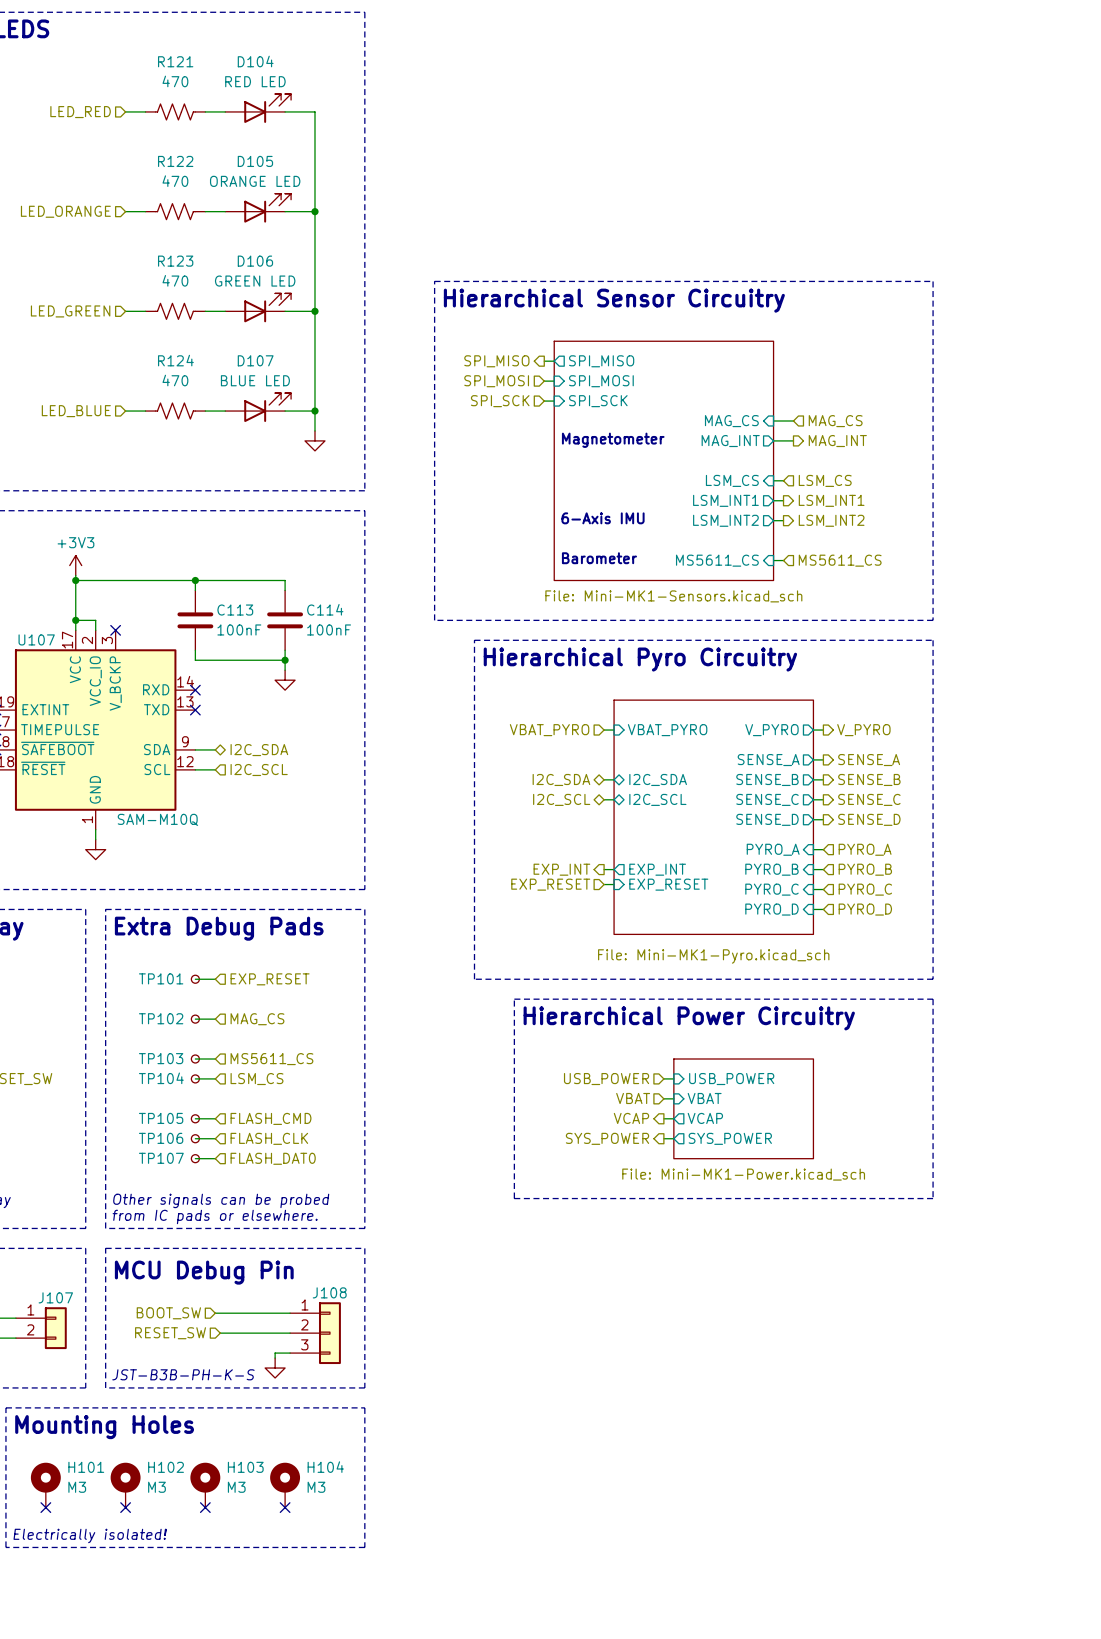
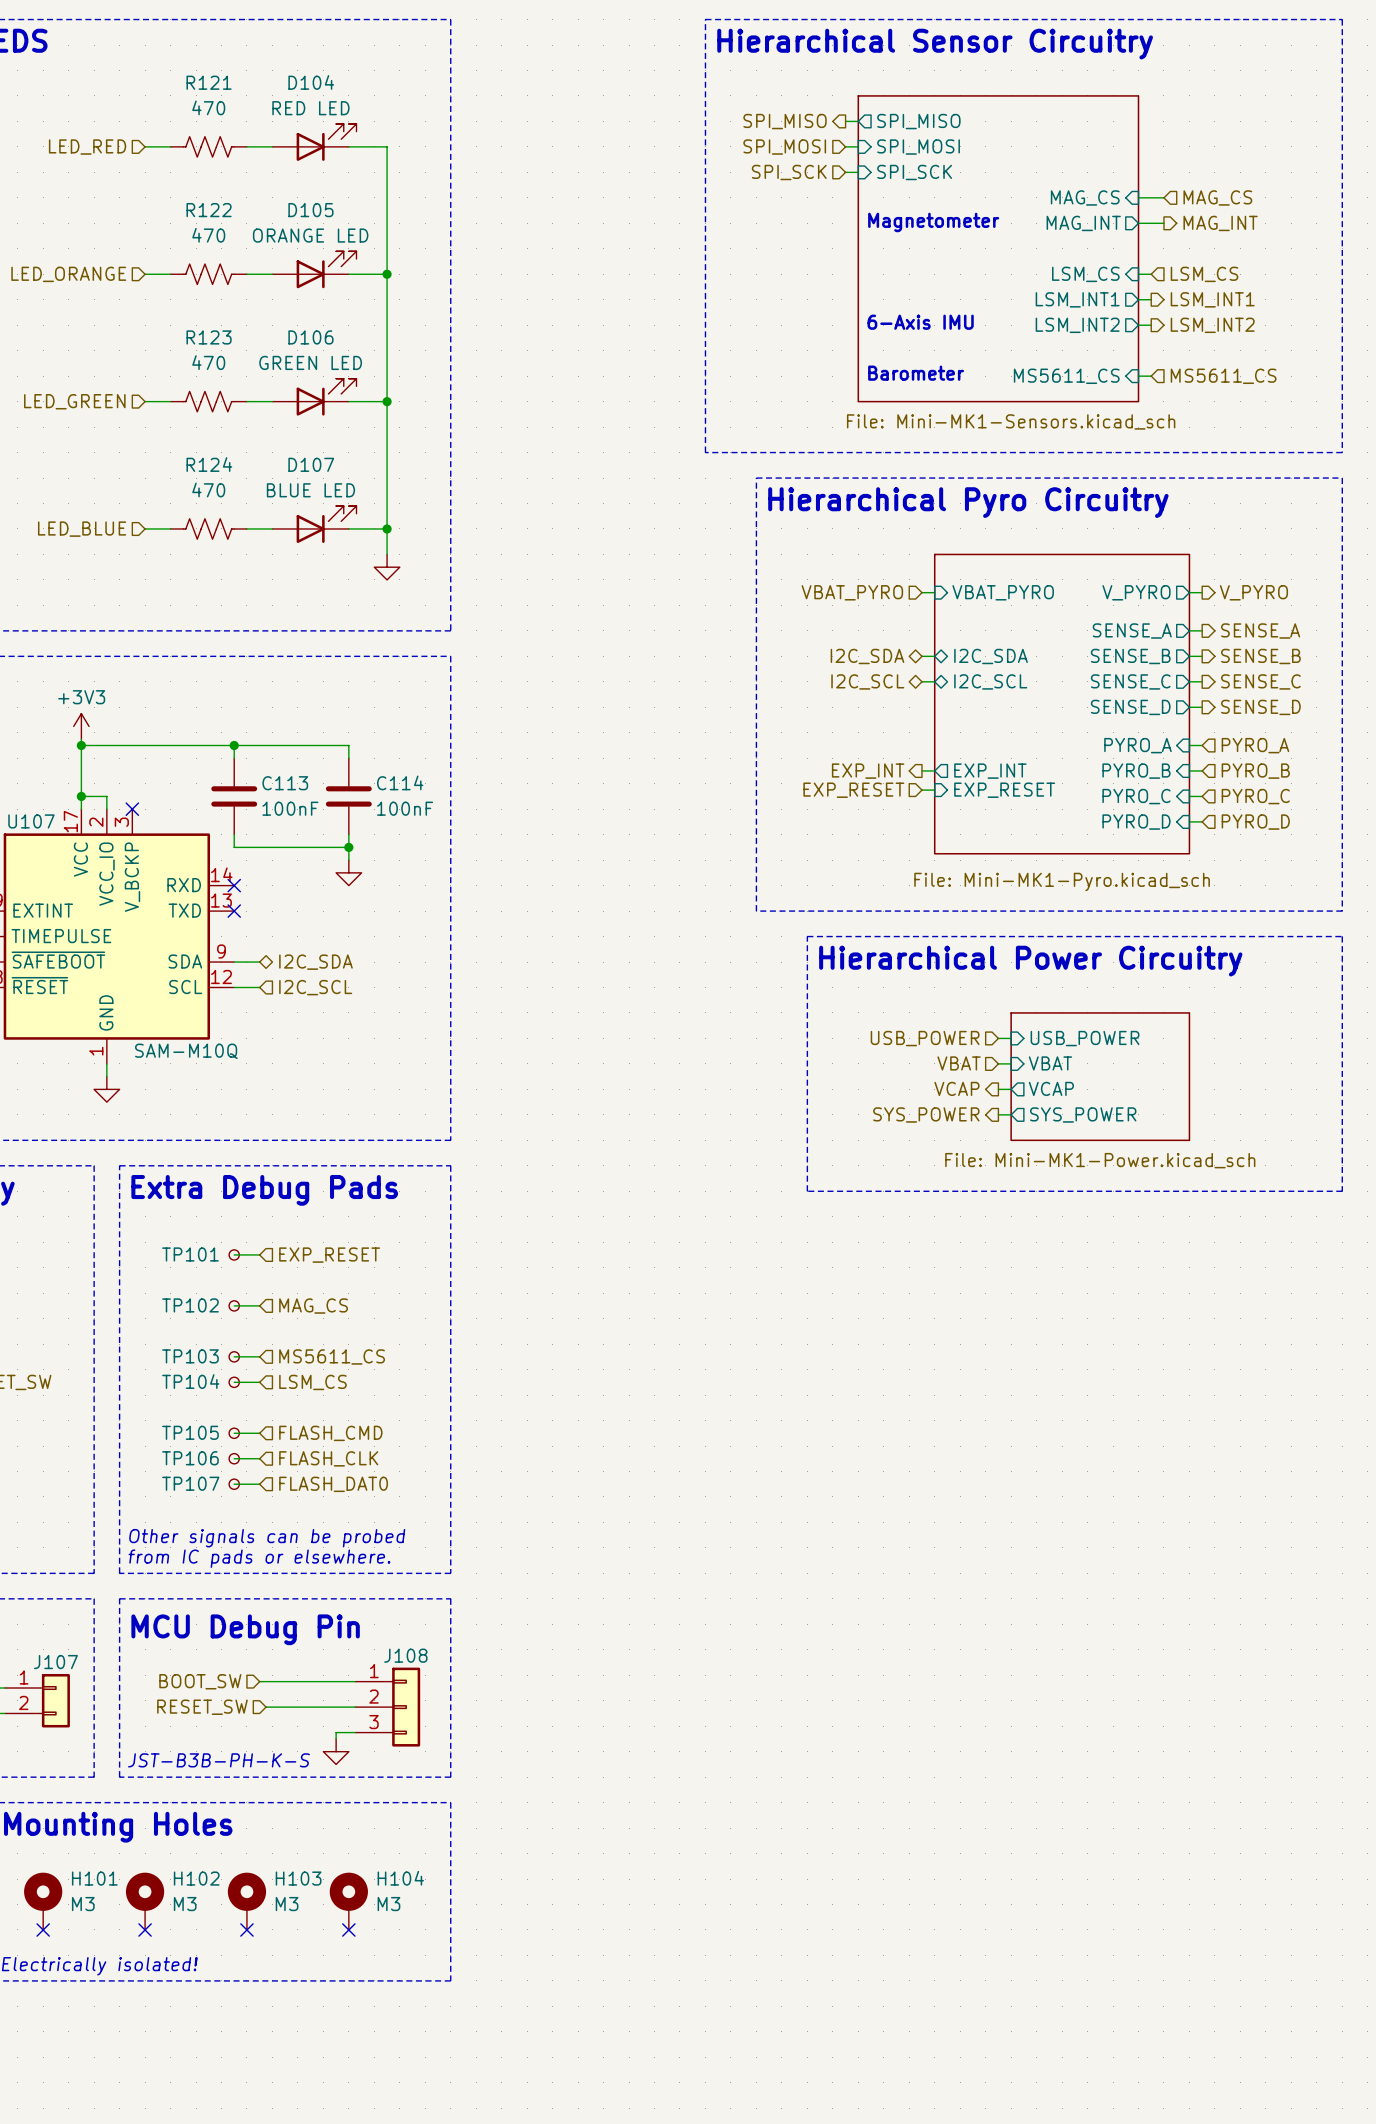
line: none -> (705, 19) (1342, 19) (1342, 452) (705, 452) (705, 19)
text: none -> Hierarchical Sensor Circuitry (935, 44)
hierarchical label: none -> SPI_MISO (785, 121)
wire: none -> (845, 121) (858, 121)
sheet pin: none -> SPI_MISO (918, 121)
wire: none -> (845, 146) (858, 146)
hierarchical label: none -> SPI_MOSI (784, 147)
sheet pin: none -> SPI_MOSI (918, 147)
wire: none -> (845, 172) (858, 172)
hierarchical label: none -> SPI_SCK (789, 172)
sheet pin: none -> SPI_SCK (914, 172)
sheet pin: none -> MAG_CS (1085, 197)
wire: none -> (1138, 197) (1163, 197)
hierarchical label: none -> MAG_CS (1217, 197)
text: none -> Magnetometer (933, 222)
sheet pin: none -> MAG_INT (1083, 223)
wire: none -> (1138, 223) (1163, 223)
hierarchical label: none -> MAG_INT (1220, 223)
sheet: none -> File: Mini-MK1-Sensors.kicad_sch (998, 248)
sheet pin: none -> LSM_CS (1085, 274)
wire: none -> (1138, 274) (1151, 274)
hierarchical label: none -> LSM_CS (1204, 274)
sheet pin: none -> LSM_INT1 (1077, 299)
wire: none -> (1138, 299) (1151, 299)
hierarchical label: none -> LSM_INT1 (1212, 299)
text: none -> 6-Axis IMU (920, 322)
sheet pin: none -> LSM_INT2 (1077, 325)
wire: none -> (1138, 325) (1151, 325)
hierarchical label: none -> LSM_INT2 (1212, 325)
line: (434, 281) (933, 281) (933, 620) (434, 620) (434, 281) -> none
text: none -> Barometer (916, 373)
sheet pin: none -> MS5611_CS (1066, 376)
wire: none -> (1138, 376) (1151, 376)
hierarchical label: none -> MS5611_CS (1223, 376)
text: Hierarchical Sensor Circuitry (614, 300) -> none
hierarchical label: SPI_MISO (496, 361) -> none
wire: (544, 361) (554, 361) -> none
sheet pin: SPI_MISO (601, 361) -> none
line: none -> (756, 478) (1342, 478) (1342, 911) (756, 911) (756, 478)
hierarchical label: SPI_MOSI (496, 381) -> none
wire: (544, 381) (554, 381) -> none
sheet pin: SPI_MOSI (601, 381) -> none
text: none -> Hierarchical Pyro Circuitry (968, 502)
hierarchical label: SPI_SCK (500, 401) -> none
wire: (544, 401) (554, 401) -> none
sheet pin: SPI_SCK (598, 401) -> none
wire: (773, 420) (793, 420) -> none
sheet pin: MAG_CS (731, 421) -> none
hierarchical label: MAG_CS (835, 421) -> none
text: Magnetometer (613, 440) -> none
wire: (773, 440) (793, 440) -> none
sheet pin: MAG_INT (730, 441) -> none
hierarchical label: MAG_INT (837, 441) -> none
sheet: File: Mini-MK1-Sensors.kicad_sch (663, 460) -> none
hierarchical label: none -> VBAT_PYRO (852, 592)
wire: none -> (921, 592) (934, 592)
sheet pin: none -> VBAT_PYRO (1003, 592)
sheet pin: none -> V_PYRO (1136, 592)
wire: none -> (1189, 592) (1202, 592)
hierarchical label: none -> V_PYRO (1253, 592)
sheet pin: LSM_CS (732, 480) -> none
wire: (773, 480) (783, 480) -> (1189, 630) (1202, 630)
hierarchical label: LSM_CS (825, 480) -> none
sheet pin: none -> SENSE_A (1132, 631)
hierarchical label: none -> SENSE_A (1260, 631)
sheet pin: LSM_INT1 (725, 500) -> none
wire: (773, 500) (783, 500) -> (1189, 656) (1202, 656)
hierarchical label: LSM_INT1 (831, 500) -> none
hierarchical label: none -> I2C_SDA (867, 656)
wire: none -> (921, 656) (934, 656)
sheet pin: none -> I2C_SDA (991, 656)
sheet pin: none -> SENSE_B (1130, 656)
hierarchical label: none -> SENSE_B (1260, 656)
text: 6-Axis IMU (603, 518) -> none
sheet pin: LSM_INT2 (725, 520) -> none
wire: (773, 520) (783, 520) -> (1189, 681) (1202, 681)
hierarchical label: LSM_INT2 (831, 520) -> none
hierarchical label: none -> I2C_SCL (867, 681)
wire: none -> (921, 681) (934, 681)
sheet pin: none -> I2C_SCL (990, 681)
sheet pin: none -> SENSE_C (1130, 681)
hierarchical label: none -> SENSE_C (1260, 681)
sheet: none -> File: Mini-MK1-Pyro.kicad_sch (1062, 704)
sheet pin: none -> SENSE_D (1130, 707)
hierarchical label: none -> SENSE_D (1260, 707)
text: Barometer (599, 558) -> none
sheet pin: MS5611_CS (717, 560) -> none
wire: (773, 560) (783, 560) -> (1189, 707) (1202, 707)
hierarchical label: MS5611_CS (840, 560) -> none
sheet pin: none -> PYRO_A (1138, 745)
wire: none -> (1189, 745) (1202, 745)
hierarchical label: none -> PYRO_A (1255, 745)
hierarchical label: none -> EXP_INT (868, 771)
sheet pin: none -> EXP_INT (990, 771)
sheet pin: none -> PYRO_B (1136, 771)
hierarchical label: none -> PYRO_B (1255, 771)
hierarchical label: none -> EXP_RESET (853, 790)
wire: none -> (921, 790) (934, 790)
sheet pin: none -> EXP_RESET (1004, 790)
sheet pin: none -> PYRO_C (1136, 796)
hierarchical label: none -> PYRO_C (1255, 796)
line: (474, 640) (933, 640) (933, 979) (474, 979) (474, 640) -> none
sheet pin: none -> PYRO_D (1136, 822)
hierarchical label: none -> PYRO_D (1255, 822)
text: Hierarchical Pyro Circuitry (640, 659) -> none
hierarchical label: VBAT_PYRO (549, 730) -> none
wire: (604, 730) (614, 730) -> (921, 770) (934, 770)
line: none -> (807, 936) (1342, 936) (1342, 1191) (807, 1191) (807, 936)
sheet pin: VBAT_PYRO (667, 730) -> none
sheet pin: V_PYRO (771, 730) -> none
wire: (813, 730) (823, 730) -> (1189, 770) (1202, 770)
hierarchical label: V_PYRO (863, 730) -> none
text: none -> Hierarchical Power Circuitry (1030, 961)
wire: (813, 759) (823, 759) -> (1189, 796) (1202, 796)
sheet pin: SENSE_A (768, 760) -> none
hierarchical label: SENSE_A (869, 760) -> none
hierarchical label: I2C_SDA (561, 779) -> none
wire: (604, 779) (614, 779) -> none
sheet pin: I2C_SDA (658, 779) -> none
sheet pin: SENSE_B (767, 779) -> none
wire: (813, 779) (823, 779) -> (1189, 821) (1202, 821)
hierarchical label: SENSE_B (869, 779) -> none
hierarchical label: I2C_SCL (561, 799) -> none
wire: (604, 799) (614, 799) -> none
sheet pin: I2C_SCL (657, 799) -> none
sheet pin: SENSE_C (767, 799) -> none
wire: (813, 799) (823, 799) -> none
hierarchical label: SENSE_C (869, 799) -> none
hierarchical label: none -> USB_POWER (925, 1038)
sheet pin: none -> USB_POWER (1085, 1038)
sheet: File: Mini-MK1-Pyro.kicad_sch (713, 817) -> none
sheet pin: SENSE_D (767, 819) -> none
wire: (813, 819) (823, 819) -> none
hierarchical label: SENSE_D (869, 819) -> none
hierarchical label: none -> VBAT (959, 1063)
sheet pin: none -> VBAT (1050, 1063)
sheet: none -> File: Mini-MK1-Power.kicad_sch (1100, 1076)
hierarchical label: none -> VCAP (956, 1088)
sheet pin: PYRO_A (773, 849) -> none
wire: (813, 849) (823, 849) -> (998, 1038) (1011, 1038)
sheet pin: none -> VCAP (1051, 1088)
hierarchical label: PYRO_A (865, 849) -> none
hierarchical label: EXP_INT (561, 869) -> none
wire: (604, 869) (614, 869) -> none
sheet pin: EXP_INT (657, 869) -> none
hierarchical label: none -> SYS_POWER (926, 1114)
sheet pin: PYRO_B (771, 869) -> none
wire: (813, 869) (823, 869) -> (998, 1063) (1011, 1063)
sheet pin: none -> SYS_POWER (1083, 1114)
hierarchical label: PYRO_B (865, 869) -> none
hierarchical label: EXP_RESET (550, 884) -> none
wire: (604, 884) (614, 884) -> none
sheet pin: EXP_RESET (668, 884) -> none
sheet pin: PYRO_C (771, 889) -> none
hierarchical label: PYRO_C (865, 889) -> none
sheet pin: PYRO_D (771, 909) -> none
wire: (813, 909) (823, 909) -> (998, 1114) (1011, 1114)
hierarchical label: PYRO_D (865, 909) -> none
line: (514, 999) (933, 999) (933, 1198) (514, 1198) (514, 999) -> none
text: Hierarchical Power Circuitry (689, 1018) -> none
wire: (663, 1078) (673, 1078) -> none
hierarchical label: USB_POWER (606, 1079) -> none
sheet pin: USB_POWER (731, 1079) -> none
hierarchical label: VBAT (633, 1098) -> none
wire: (663, 1098) (673, 1098) -> none
sheet pin: VBAT (704, 1098) -> none
sheet: File: Mini-MK1-Power.kicad_sch (743, 1108) -> none
hierarchical label: VCAP (631, 1118) -> none
wire: (663, 1118) (673, 1118) -> none
sheet pin: VCAP (705, 1118) -> none
hierarchical label: SYS_POWER (607, 1138) -> none
wire: (663, 1138) (673, 1138) -> none
sheet pin: SYS_POWER (730, 1138) -> none

